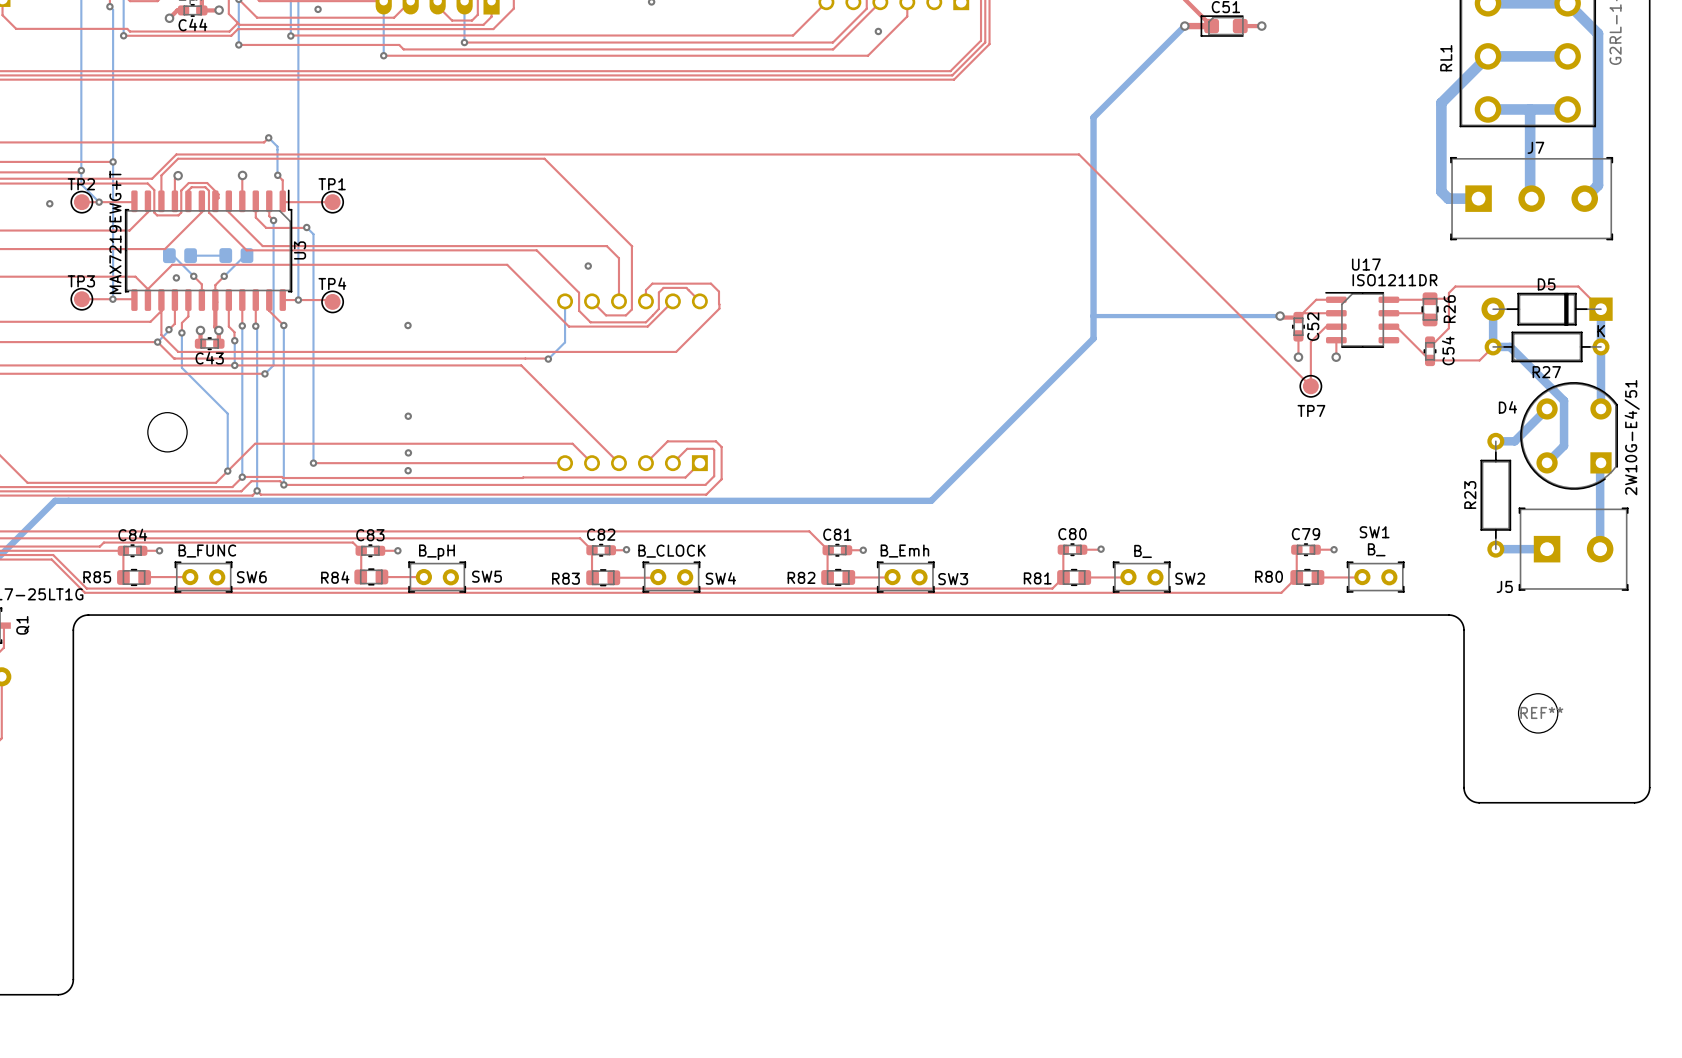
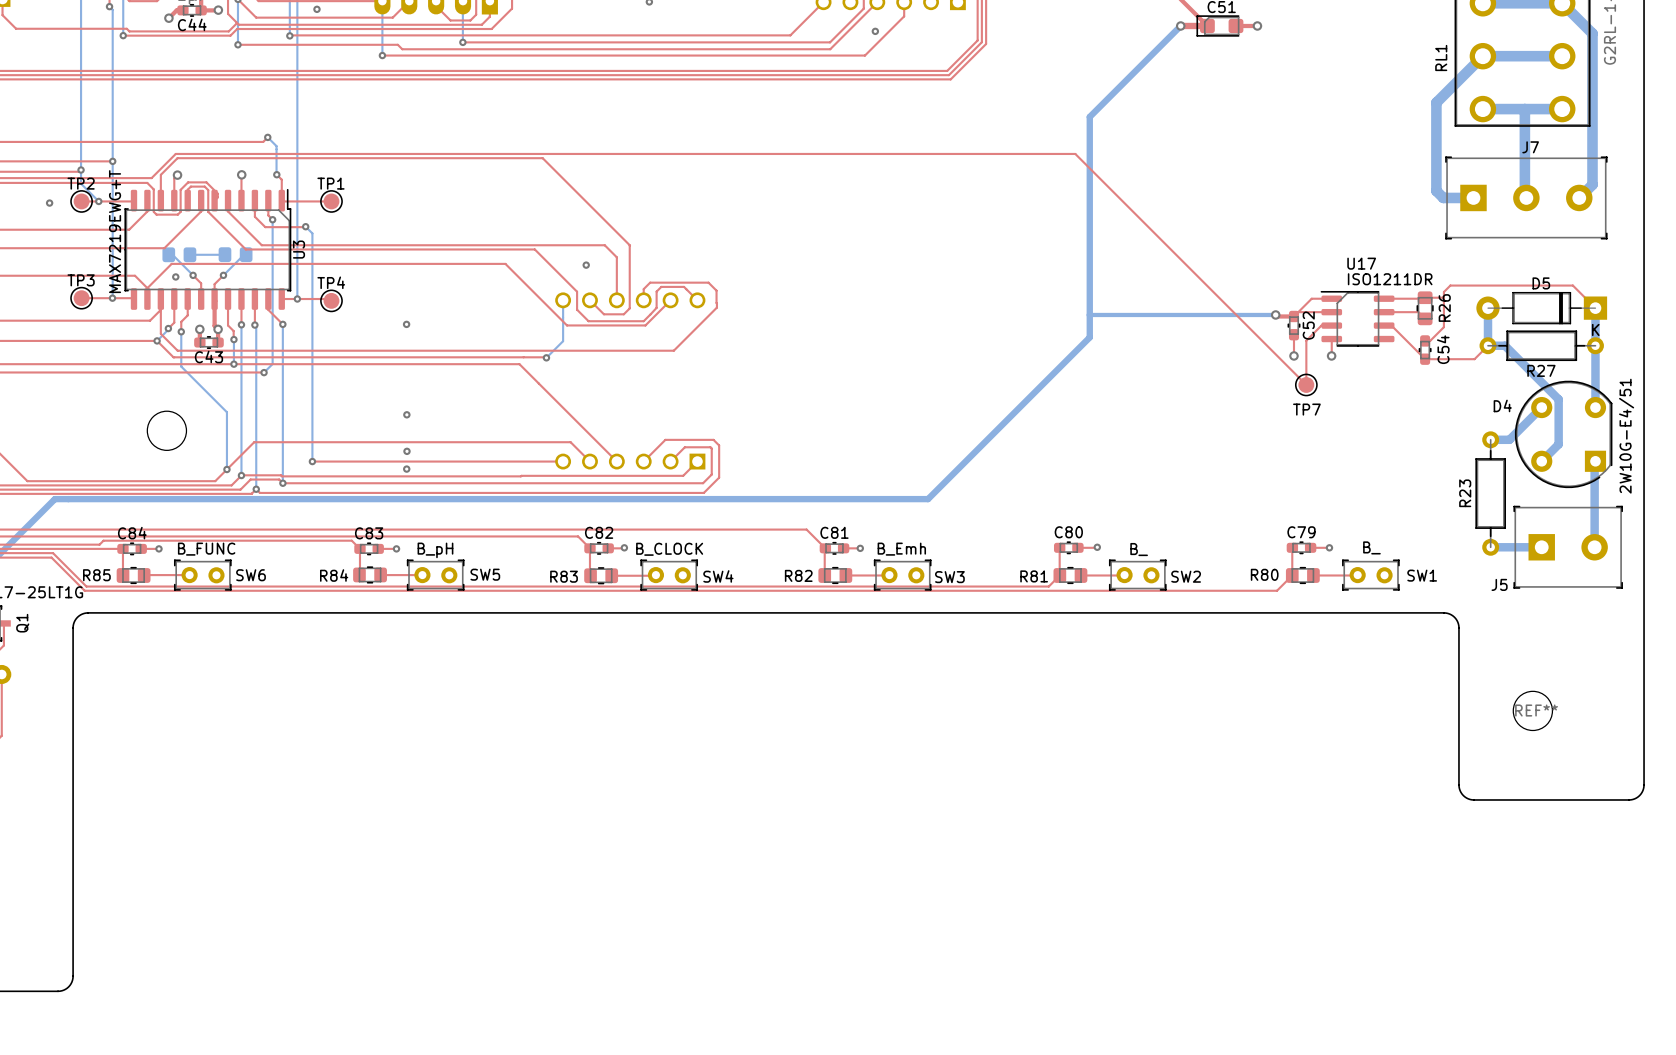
D5 footprint: [1481, 292, 1613, 326] -> [1476, 291, 1608, 325]
SW1 name position: SW1 (1374, 532) -> SW1 (1422, 575)

